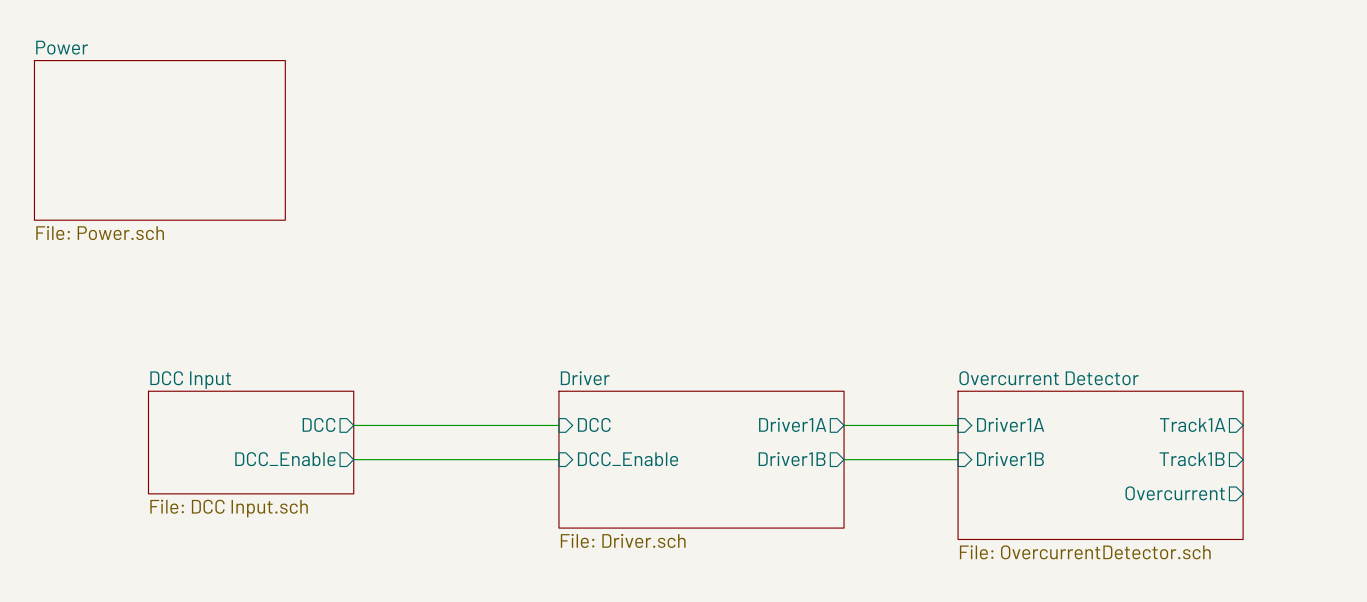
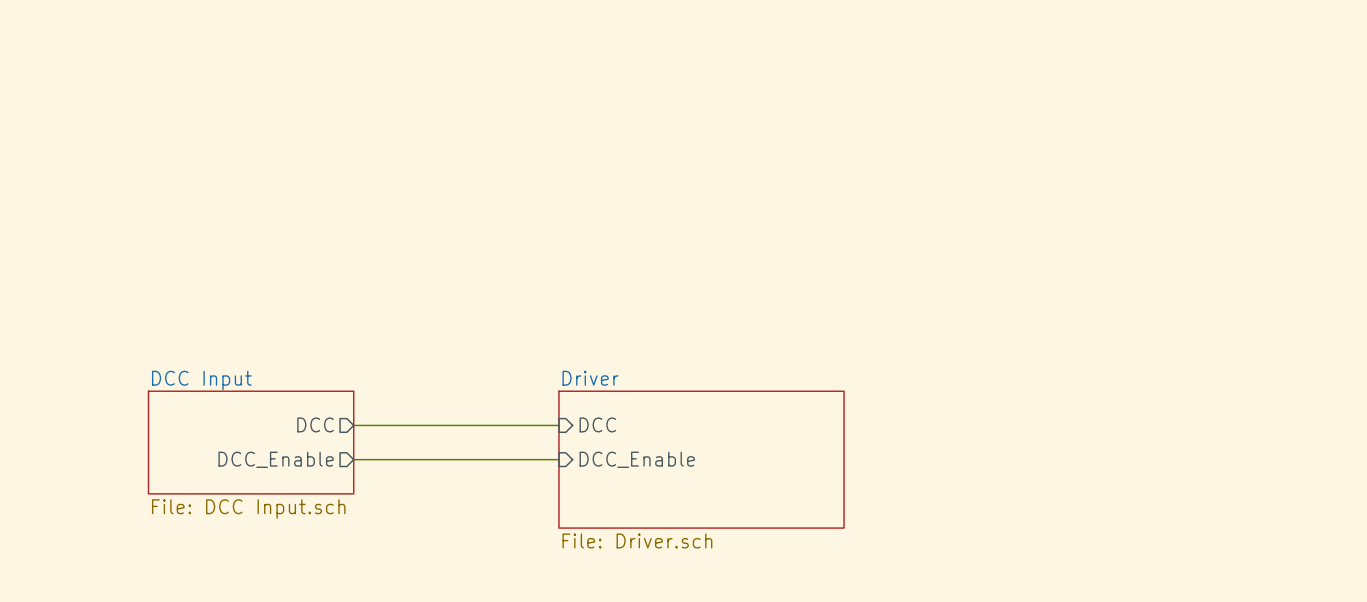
sheet Power: File: Power.sch (159, 140) -> none
sheet pin: Driver1A (792, 424) -> none
sheet pin: Driver1A (1010, 424) -> none
wire: (844, 425) (958, 425) -> none
sheet pin: Track1A (1192, 425) -> none
sheet pin: Driver1B (792, 459) -> none
wire: (844, 459) (958, 459) -> none
sheet pin: Driver1B (1010, 459) -> none
sheet pin: Track1B (1192, 459) -> none
sheet Overcurrent Detector: File: OvercurrentDetector.sch (1100, 465) -> none
sheet pin: Overcurrent (1175, 493) -> none

